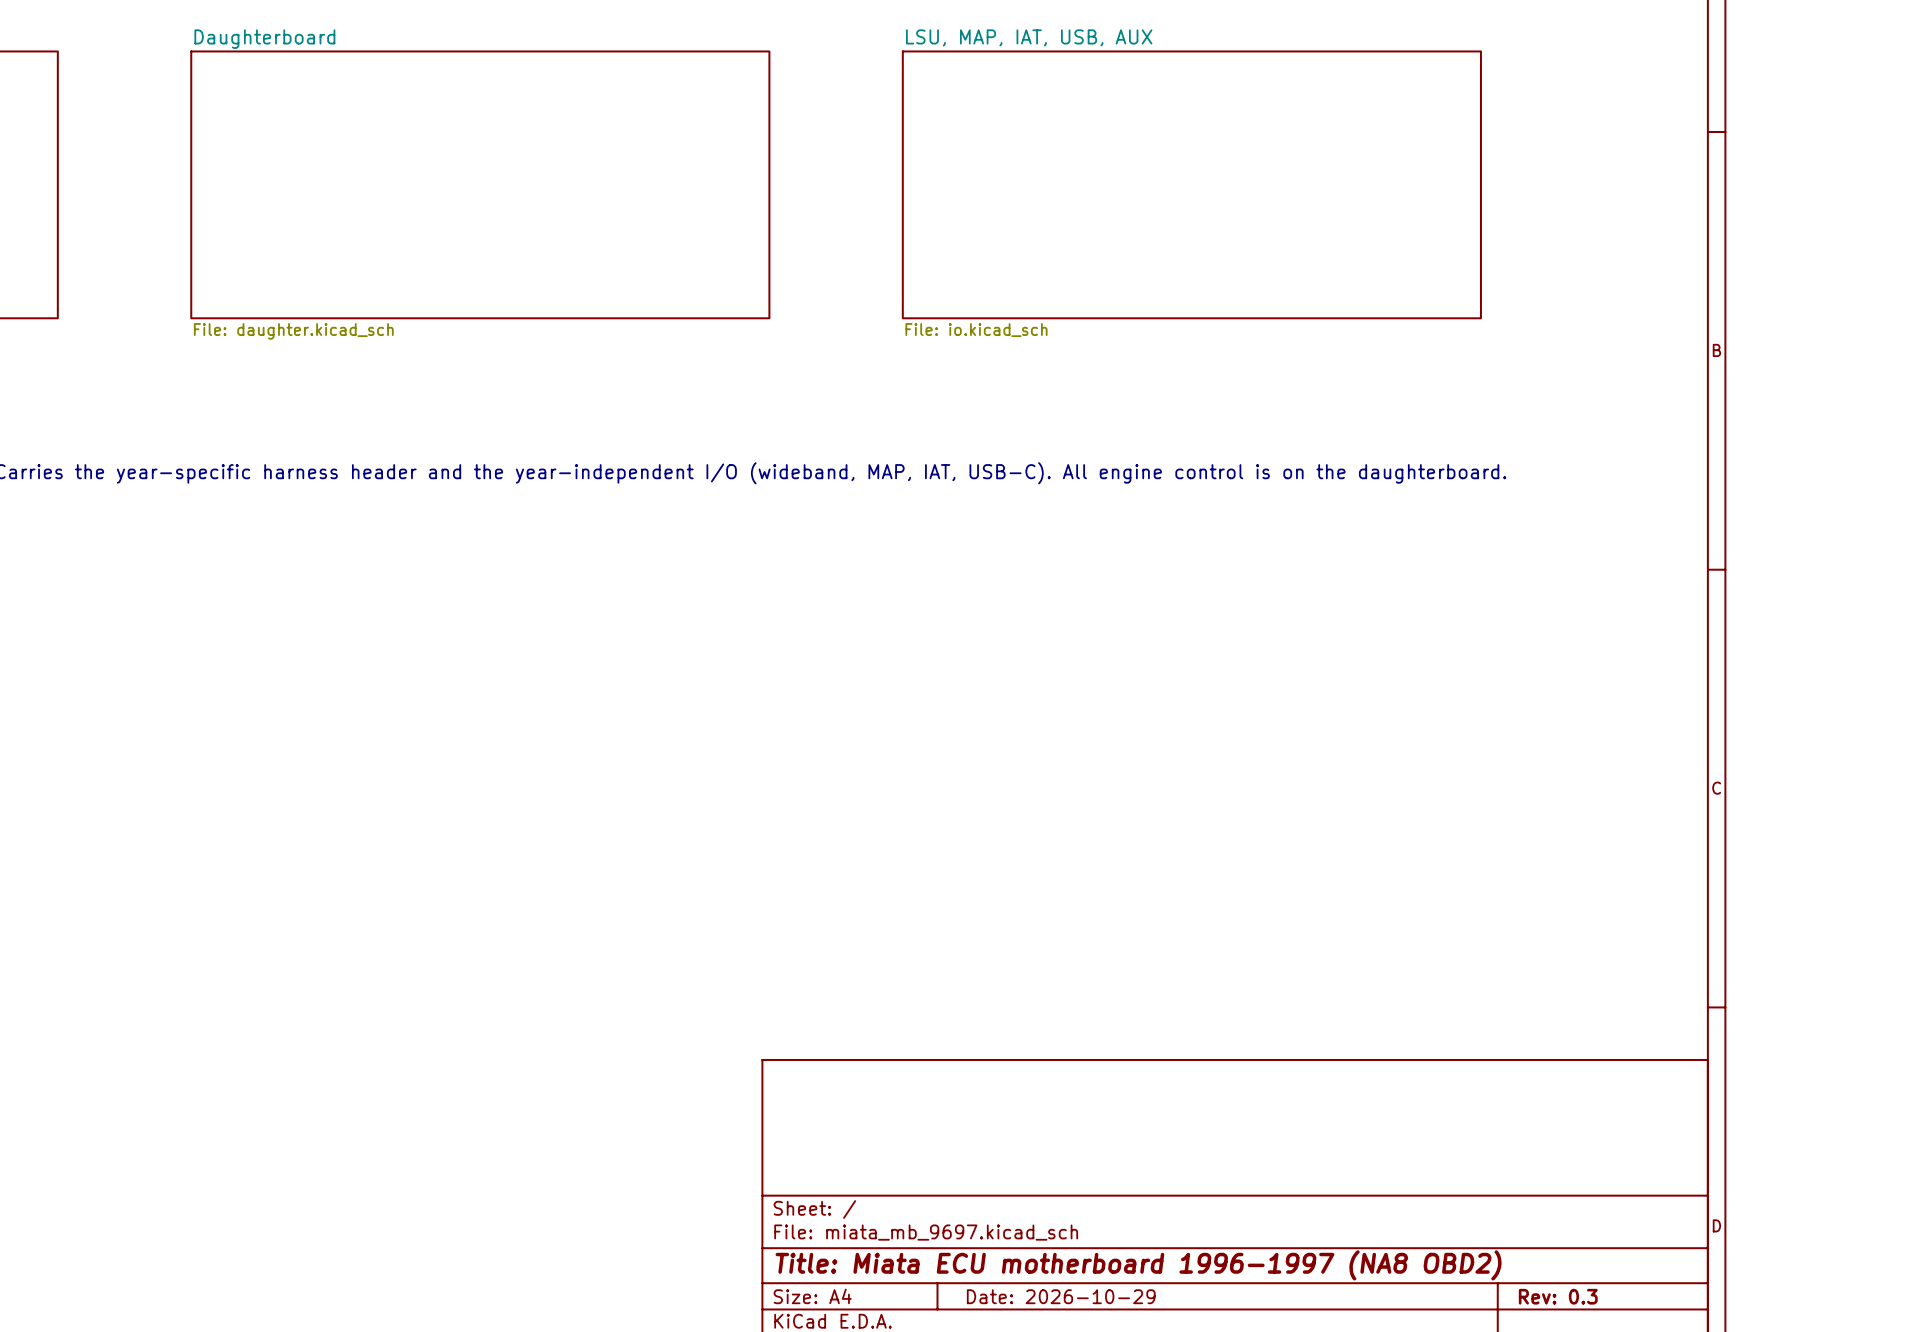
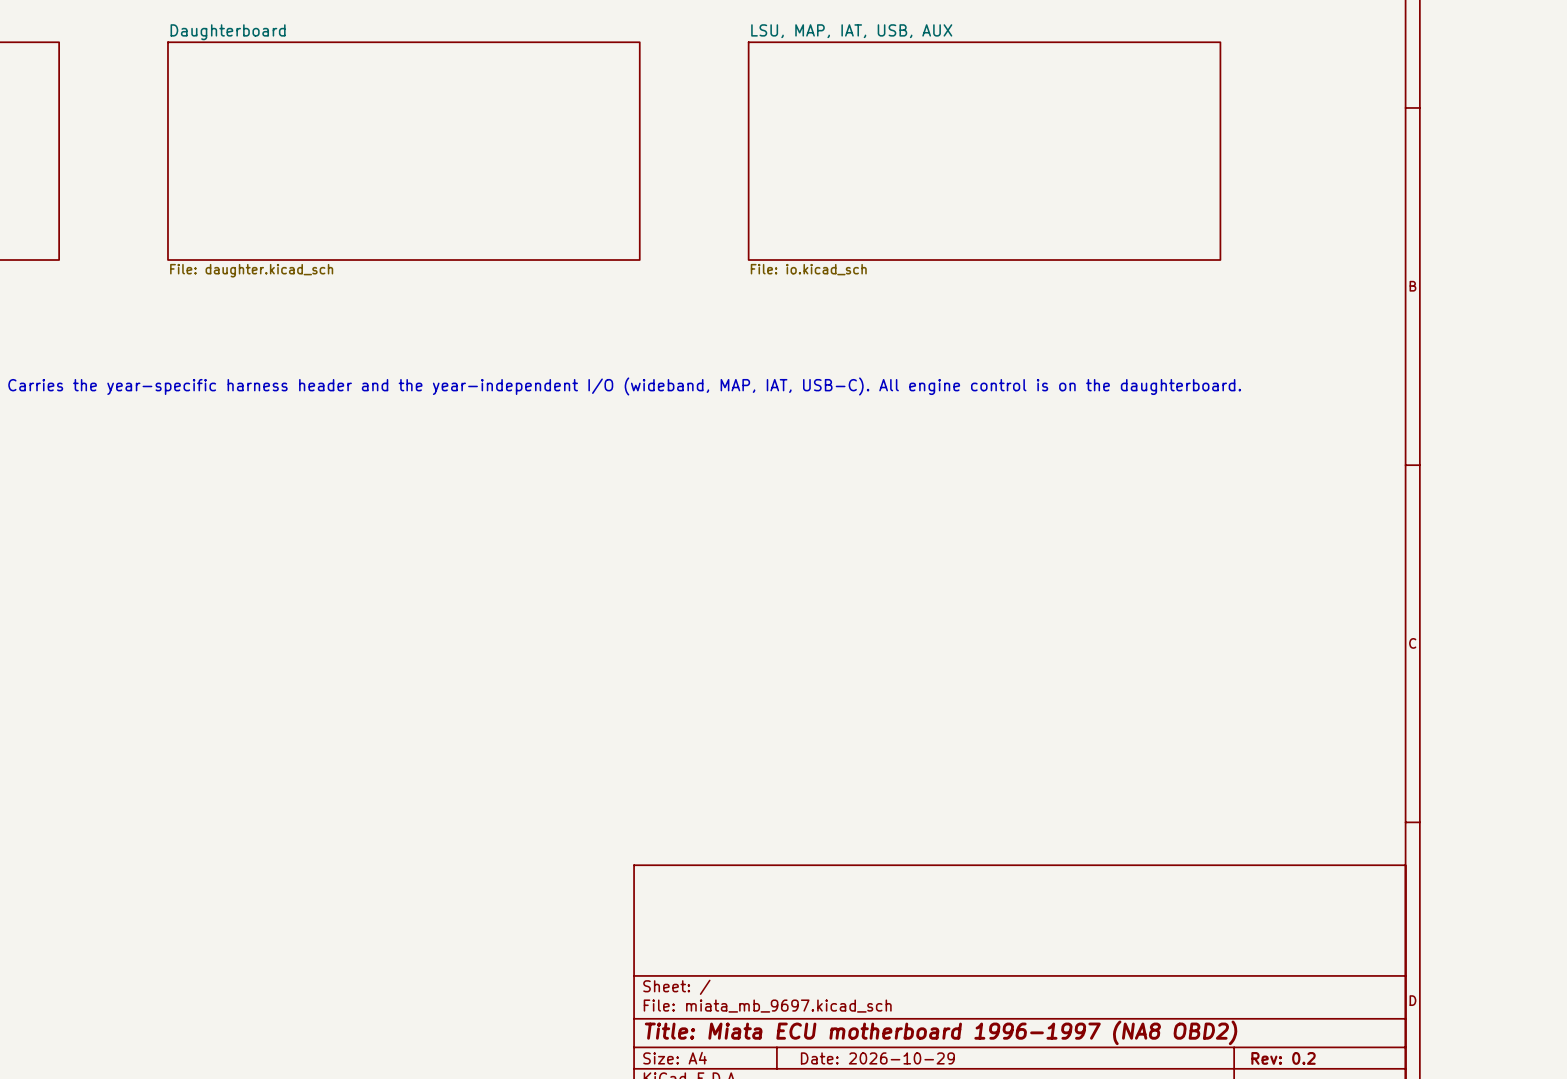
title block: Rev: 0.3 (1558, 1296) -> Rev: 0.2 (1283, 1058)

